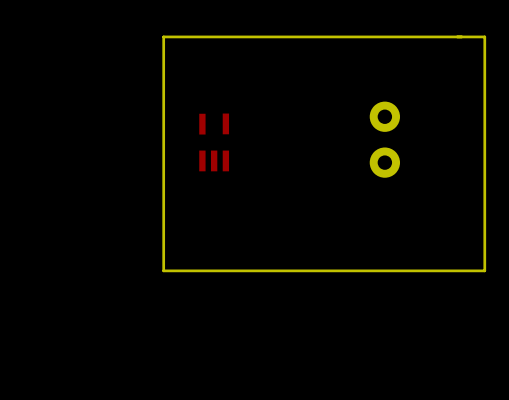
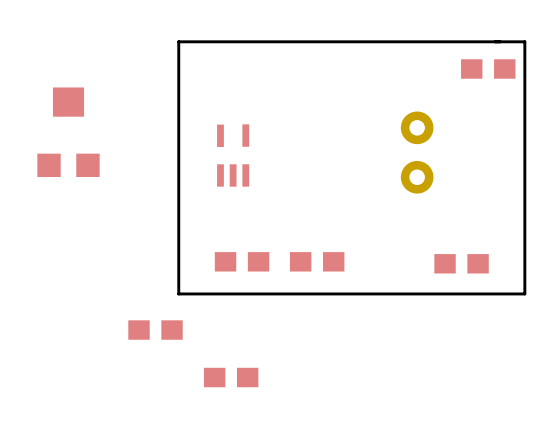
part: none -> (488, 68)
part: none -> (68, 132)
part: none -> (242, 261)
part: none -> (317, 261)
part: none -> (461, 263)
part: none -> (155, 330)
part: none -> (231, 377)

